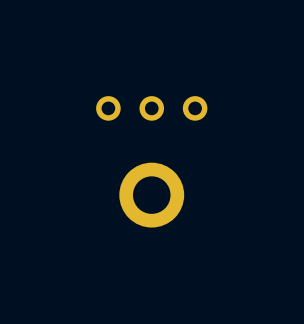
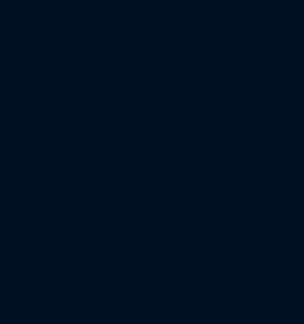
part: (151, 108) -> none
part: (151, 195) -> none

